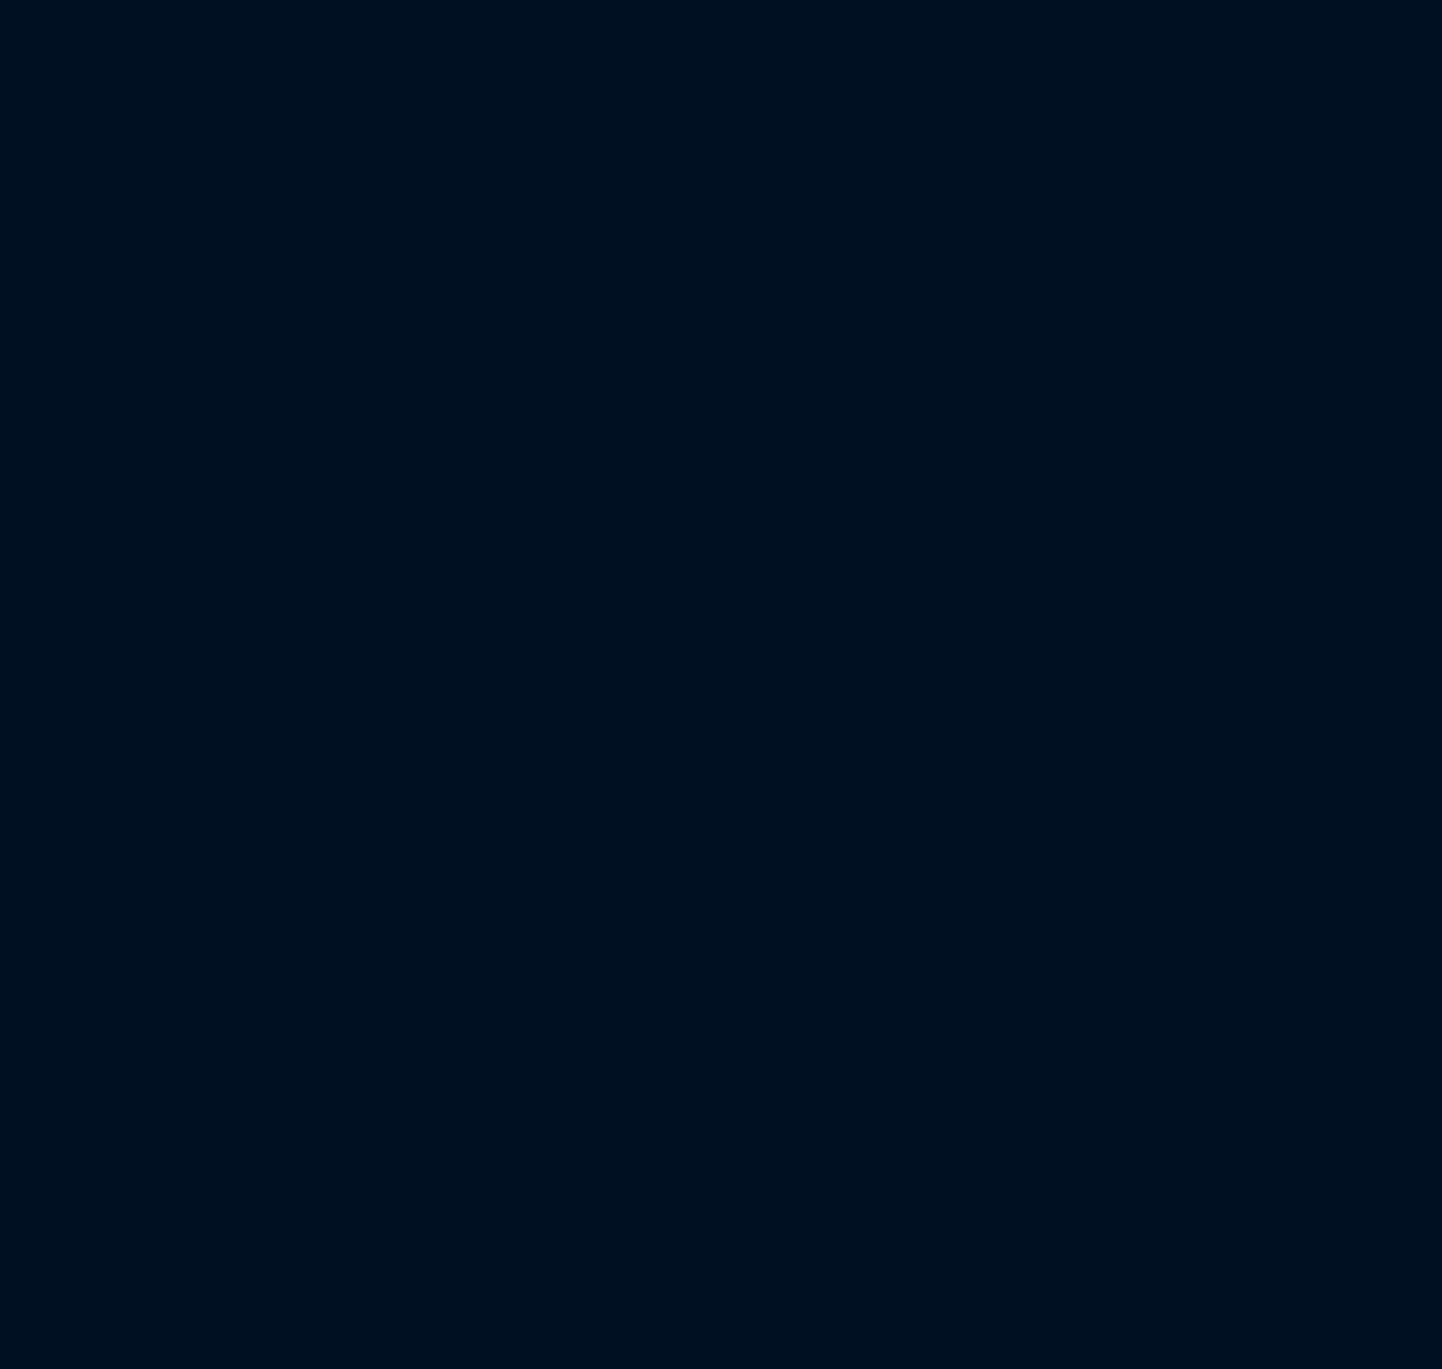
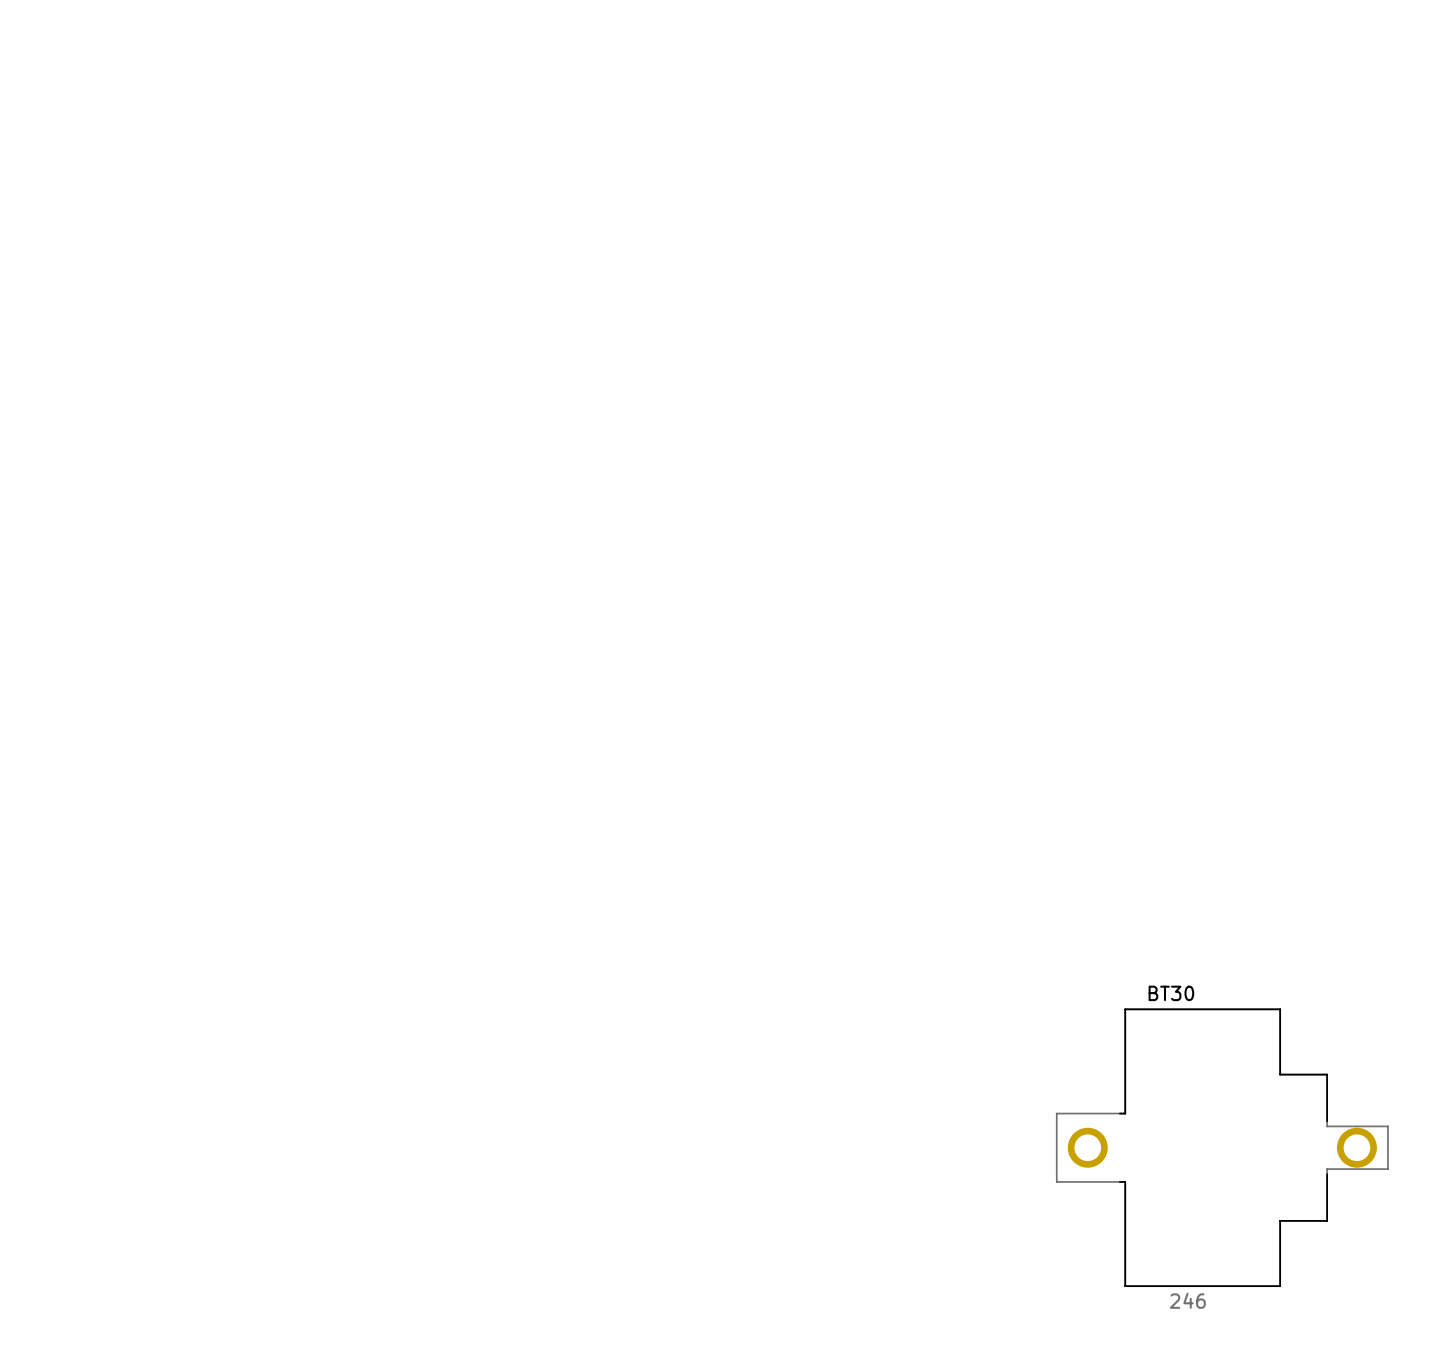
BT30: none -> 246 (1222, 1147)

